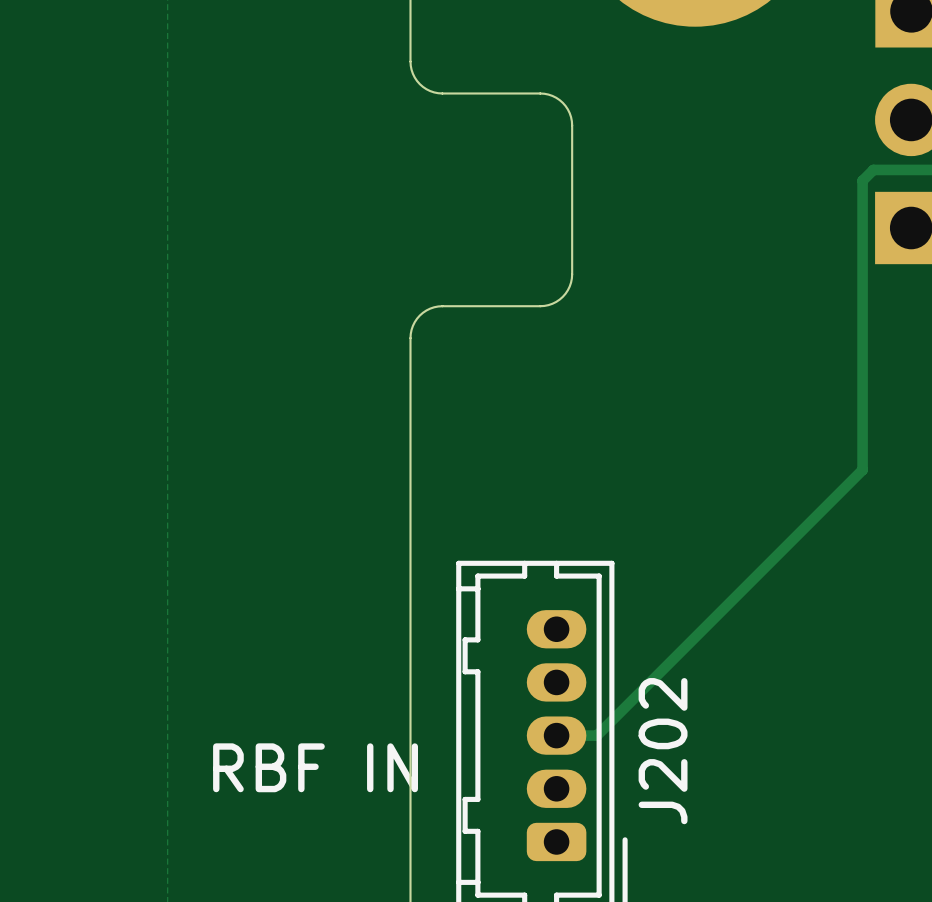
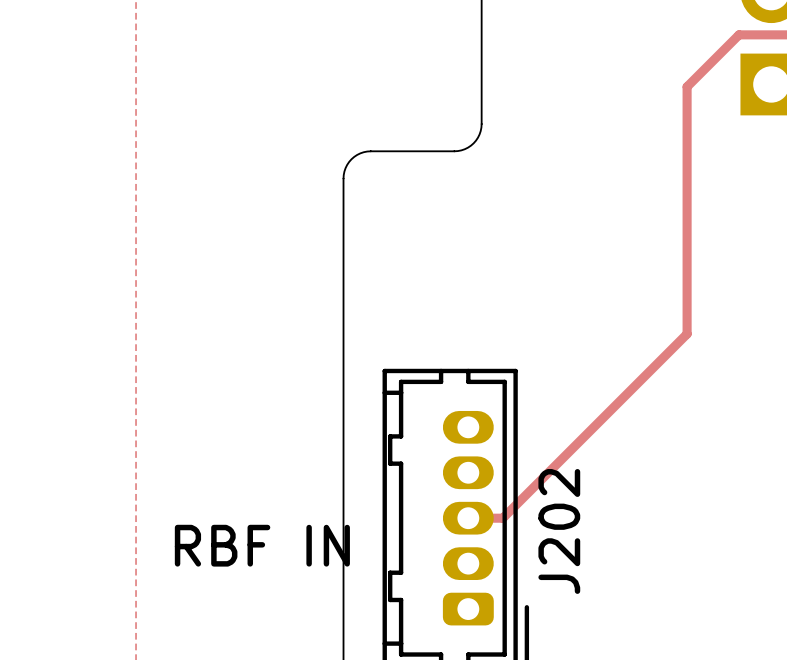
track: (862, 180) (862, 470) (812, 520) -> (729, 44) (687, 86) (687, 333)

